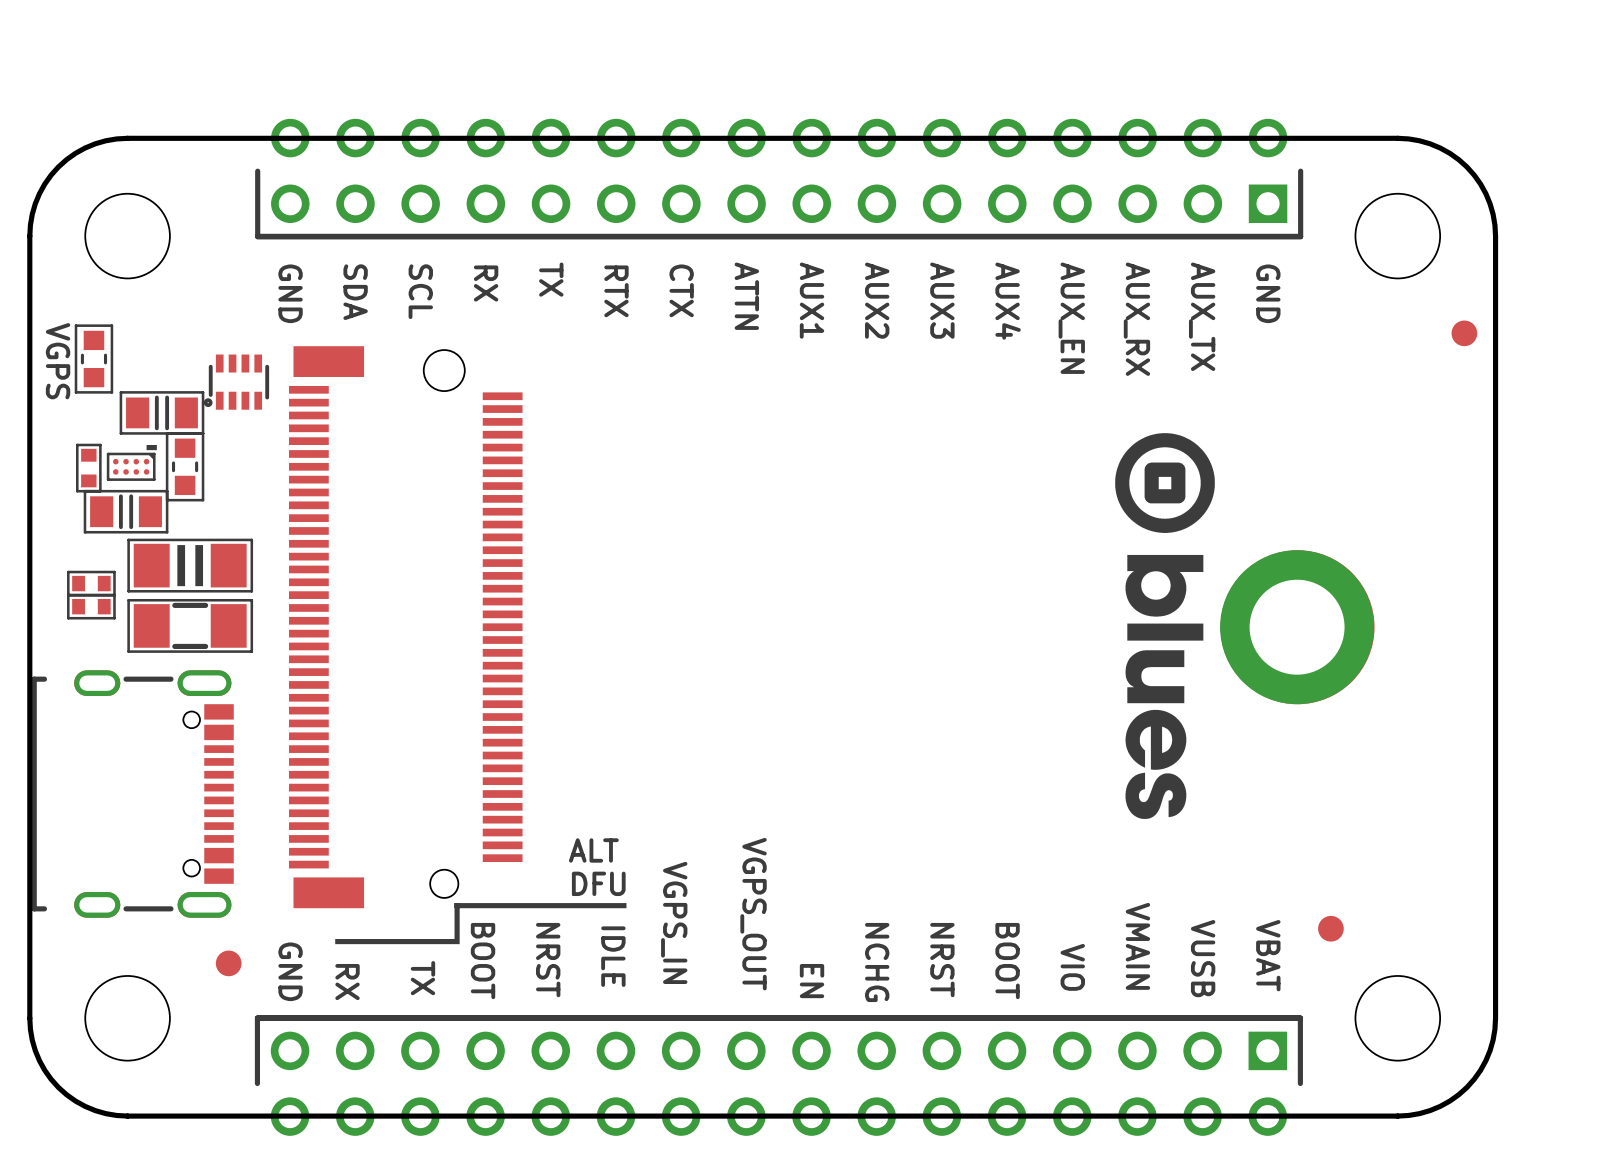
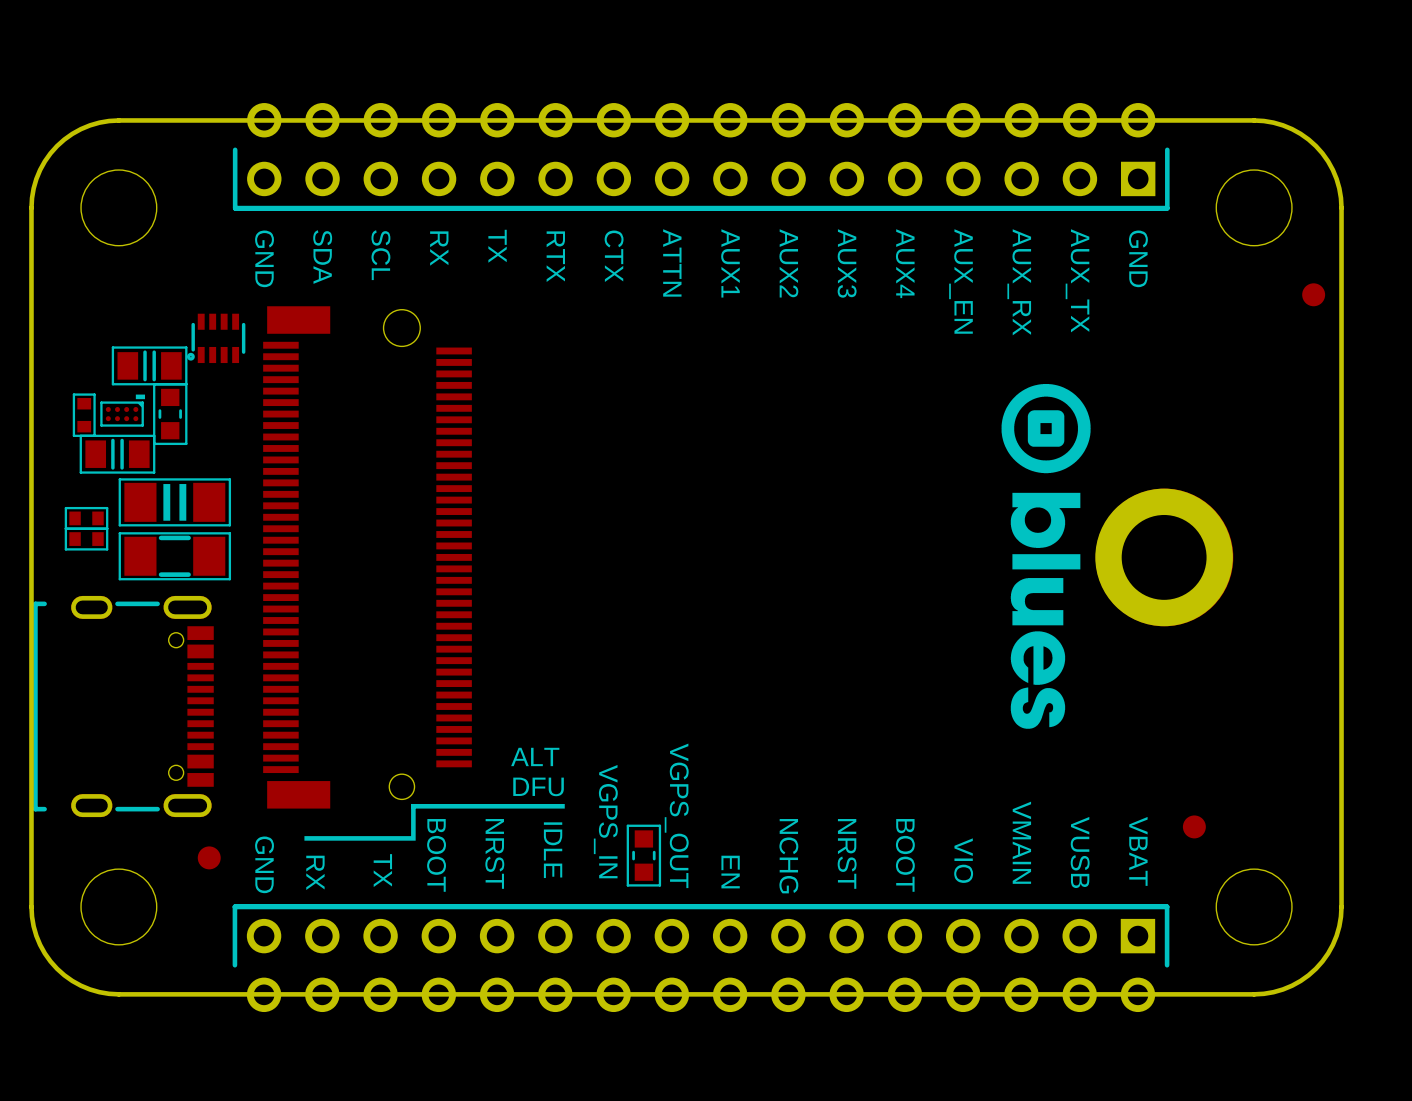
part: (93, 359) -> none
text: VGPS (58, 361) -> none
part: none -> (643, 855)

